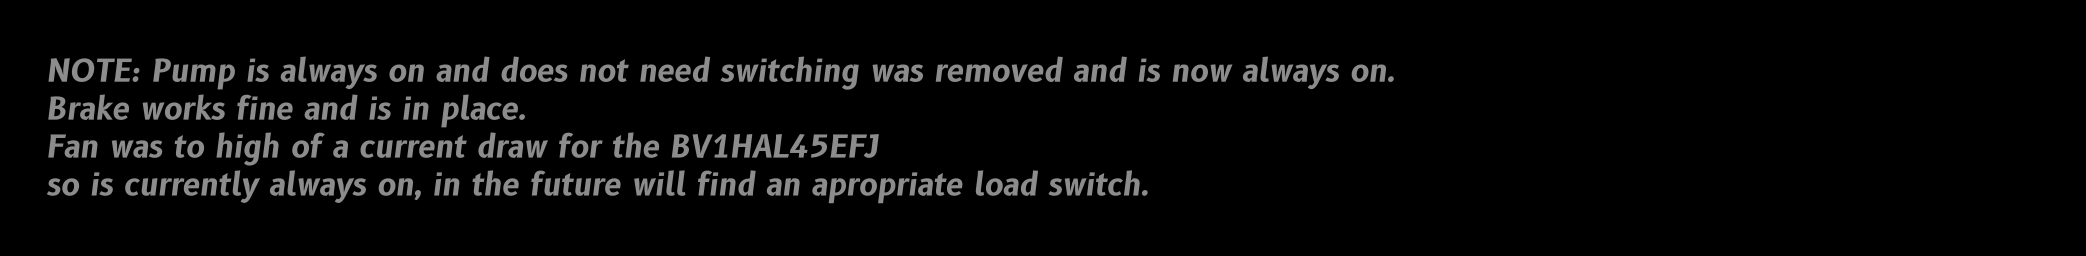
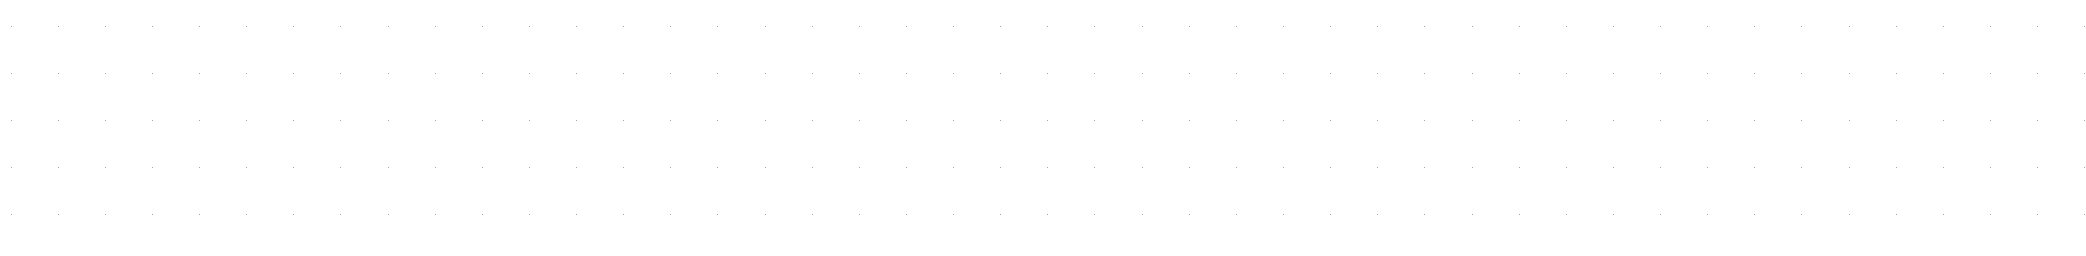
text: NOTE: Pump is always on and does not need switching was removed and is now always on. (721, 73) -> none
text: Brake works fine and is in place. (286, 110) -> none
text: Fan was to high of a current draw for the BV1HAL45EFJ (463, 148) -> none
text: so is currently always on, in the future will find an apropriate load switch. (597, 186) -> none

